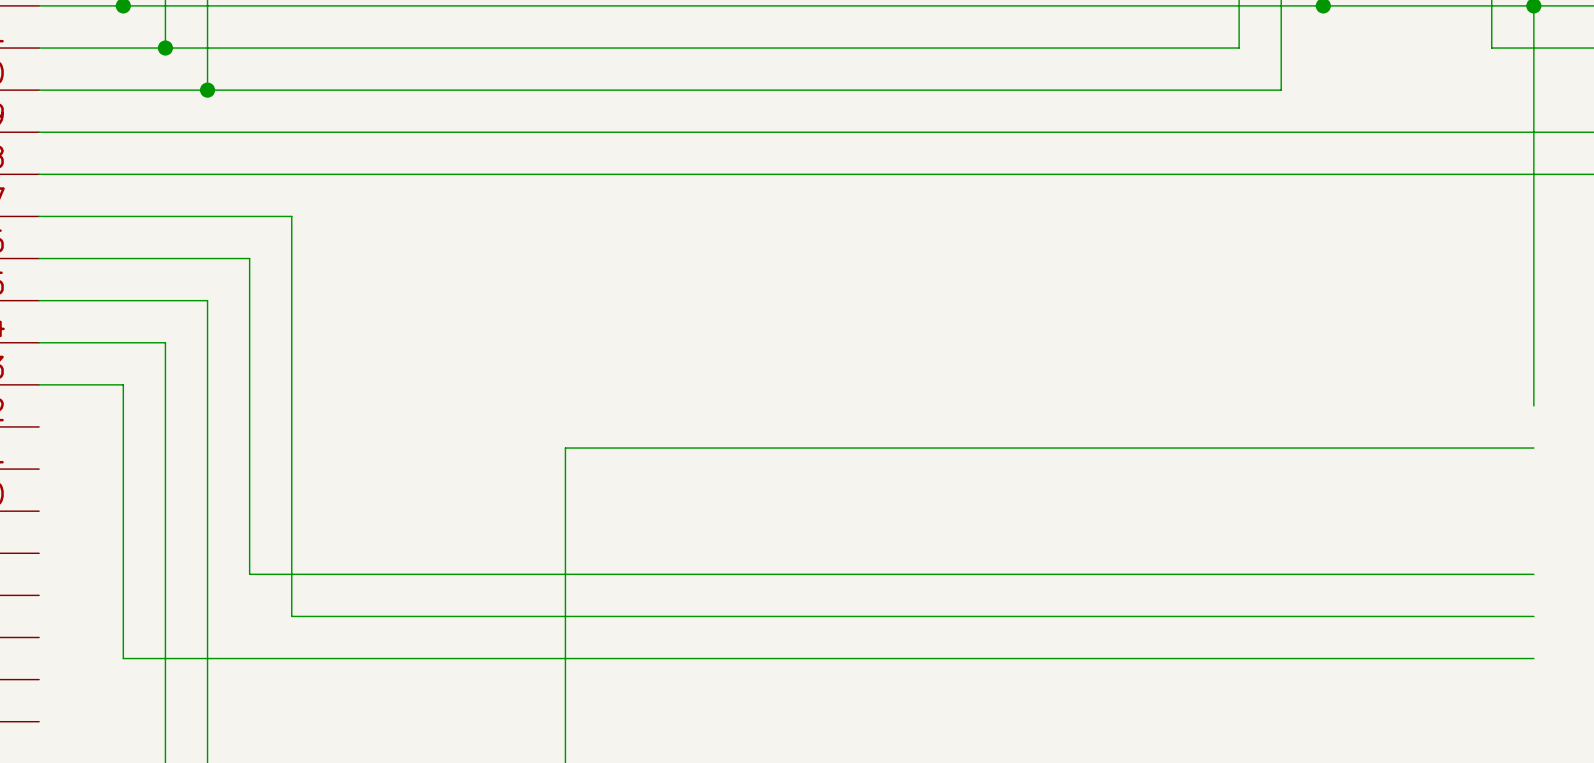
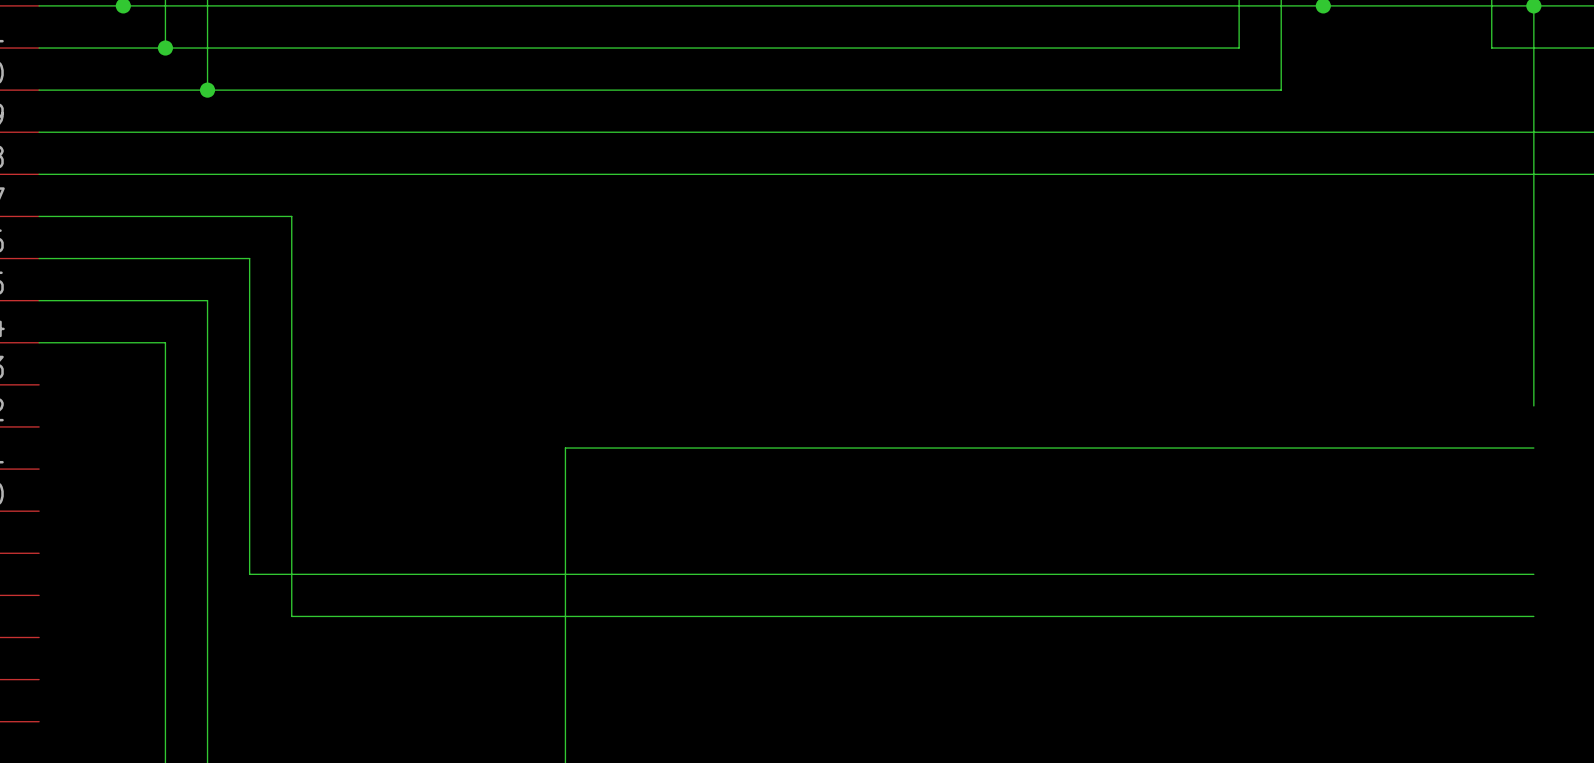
wire: (39, 384) (123, 384) (123, 658) (1533, 658) -> none

